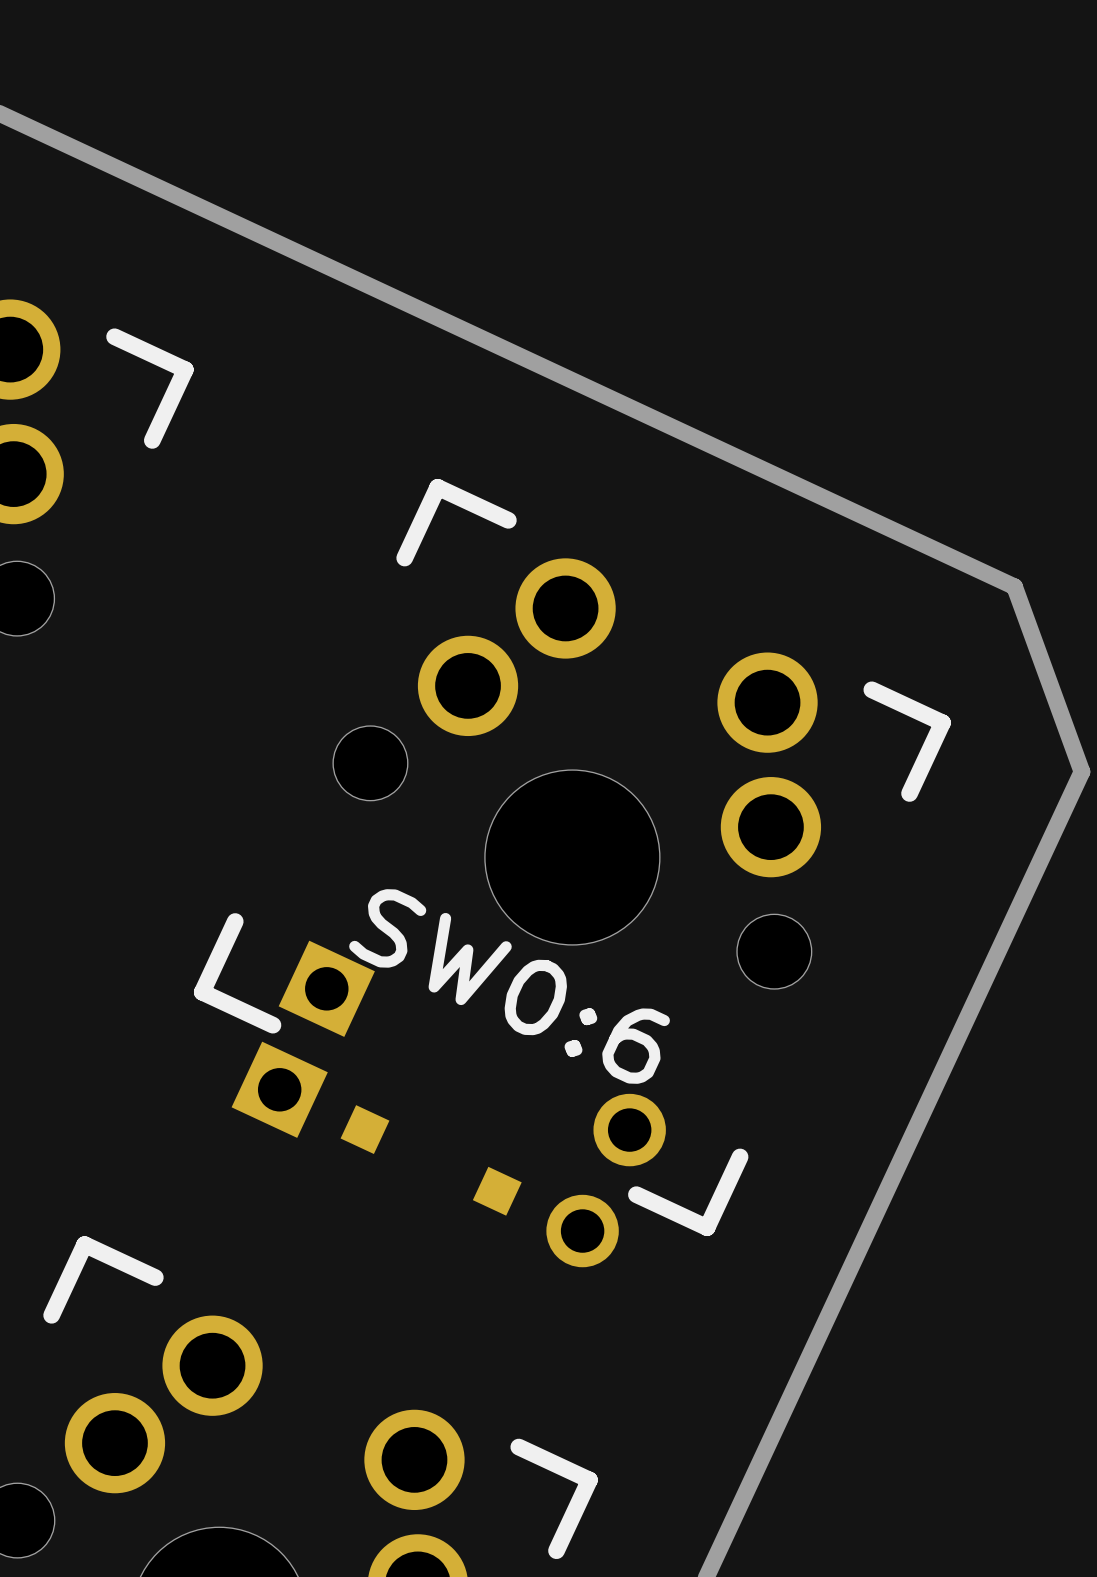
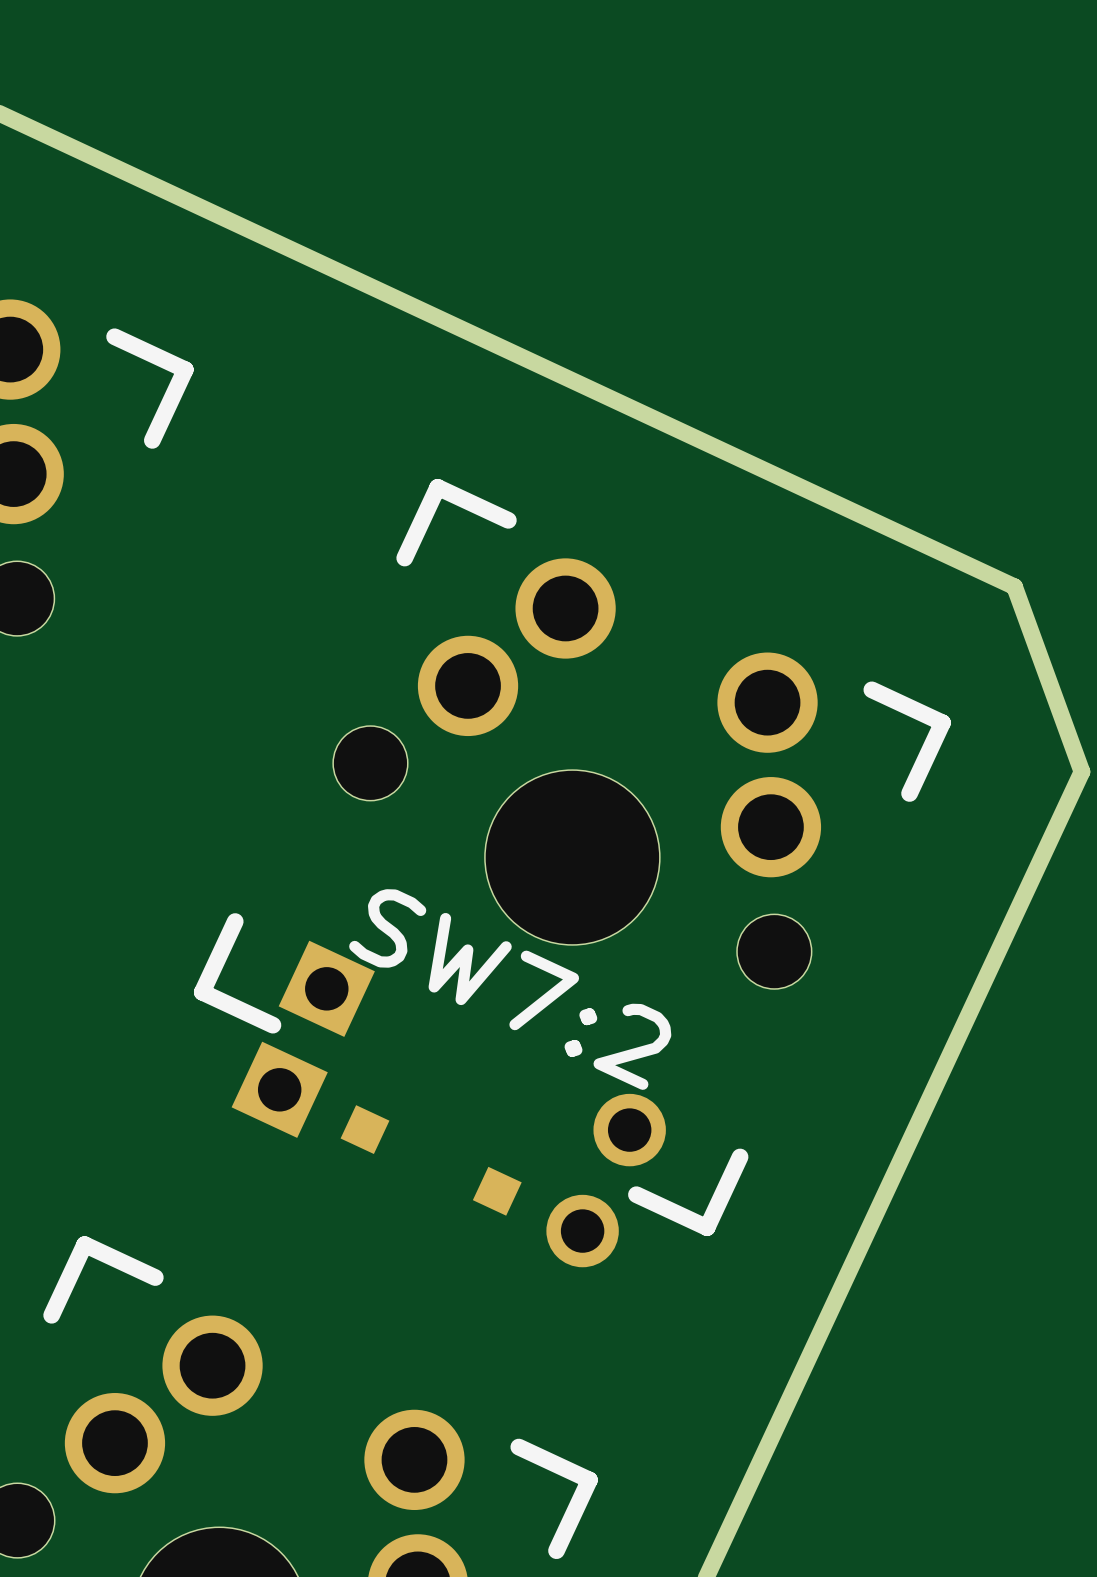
part value: SW0:6 (509, 986) -> SW7:2 (510, 989)

